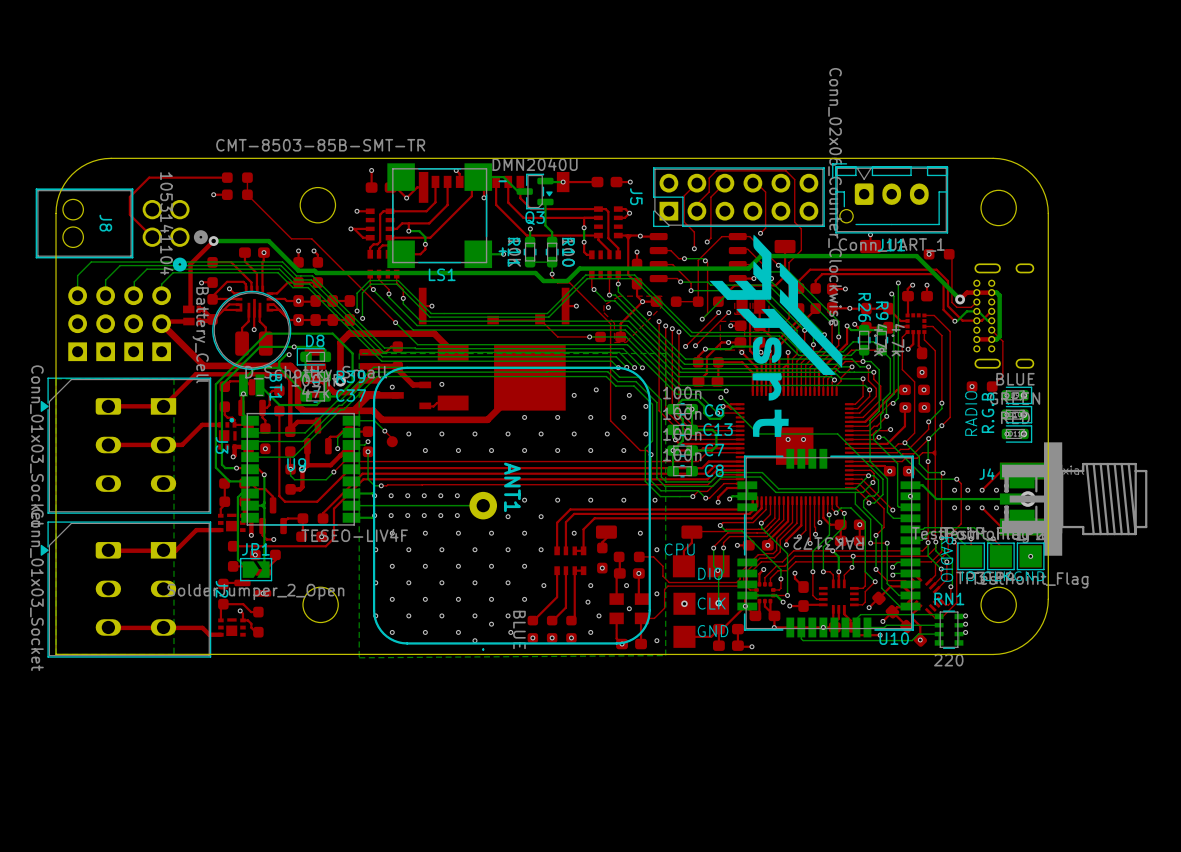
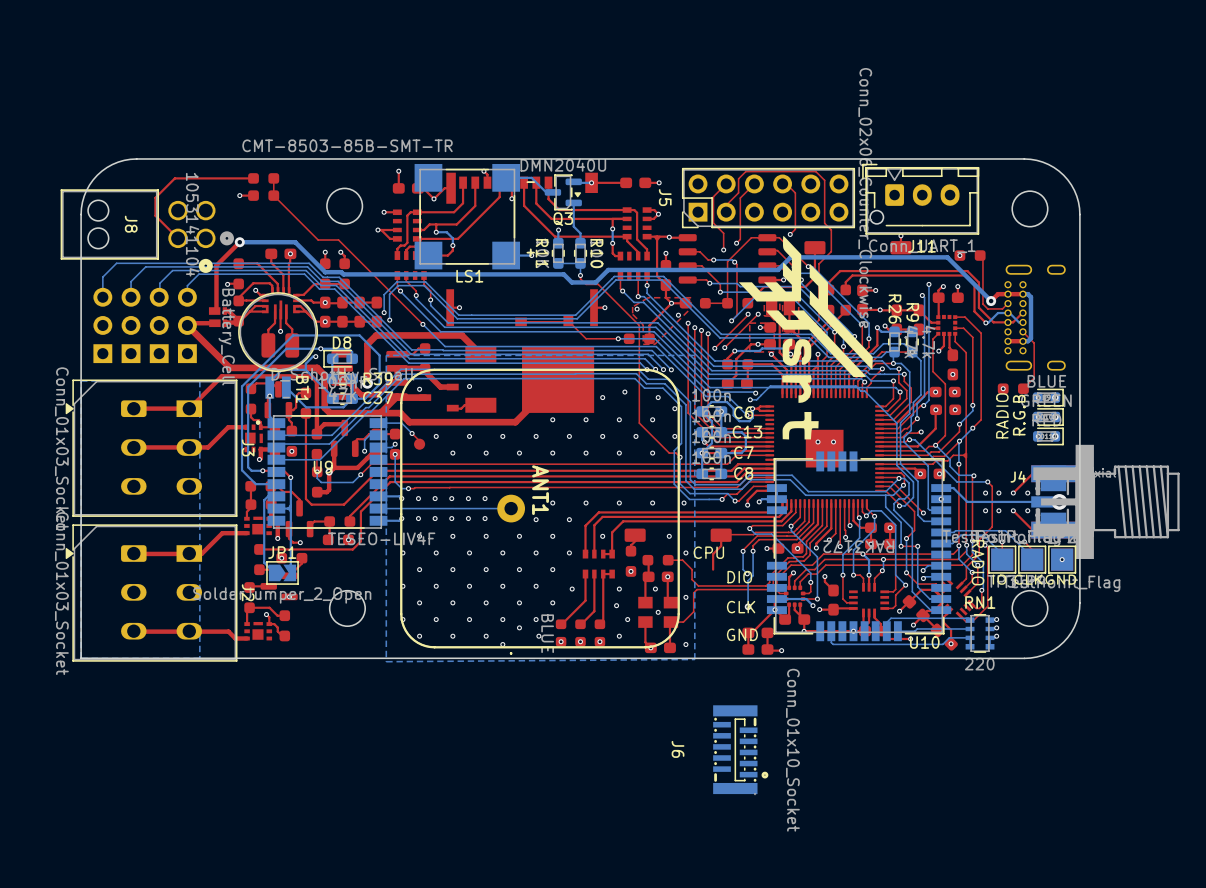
bottom track: (721, 397) (758, 433) (837, 433) (866, 462) -> (751, 399) (756, 399) (770, 386) (855, 386) (860, 391) (864, 391) (896, 423) (896, 465)
part: (683, 566) -> none
part: (718, 566) -> none
part: (684, 603) -> none
via: (684, 603) -> none
part: (718, 603) -> none
top track: (718, 629) (711, 636) (684, 636) -> none
part: (684, 636) -> none
J6: none -> Conn_01x10_Socket (740, 750)

